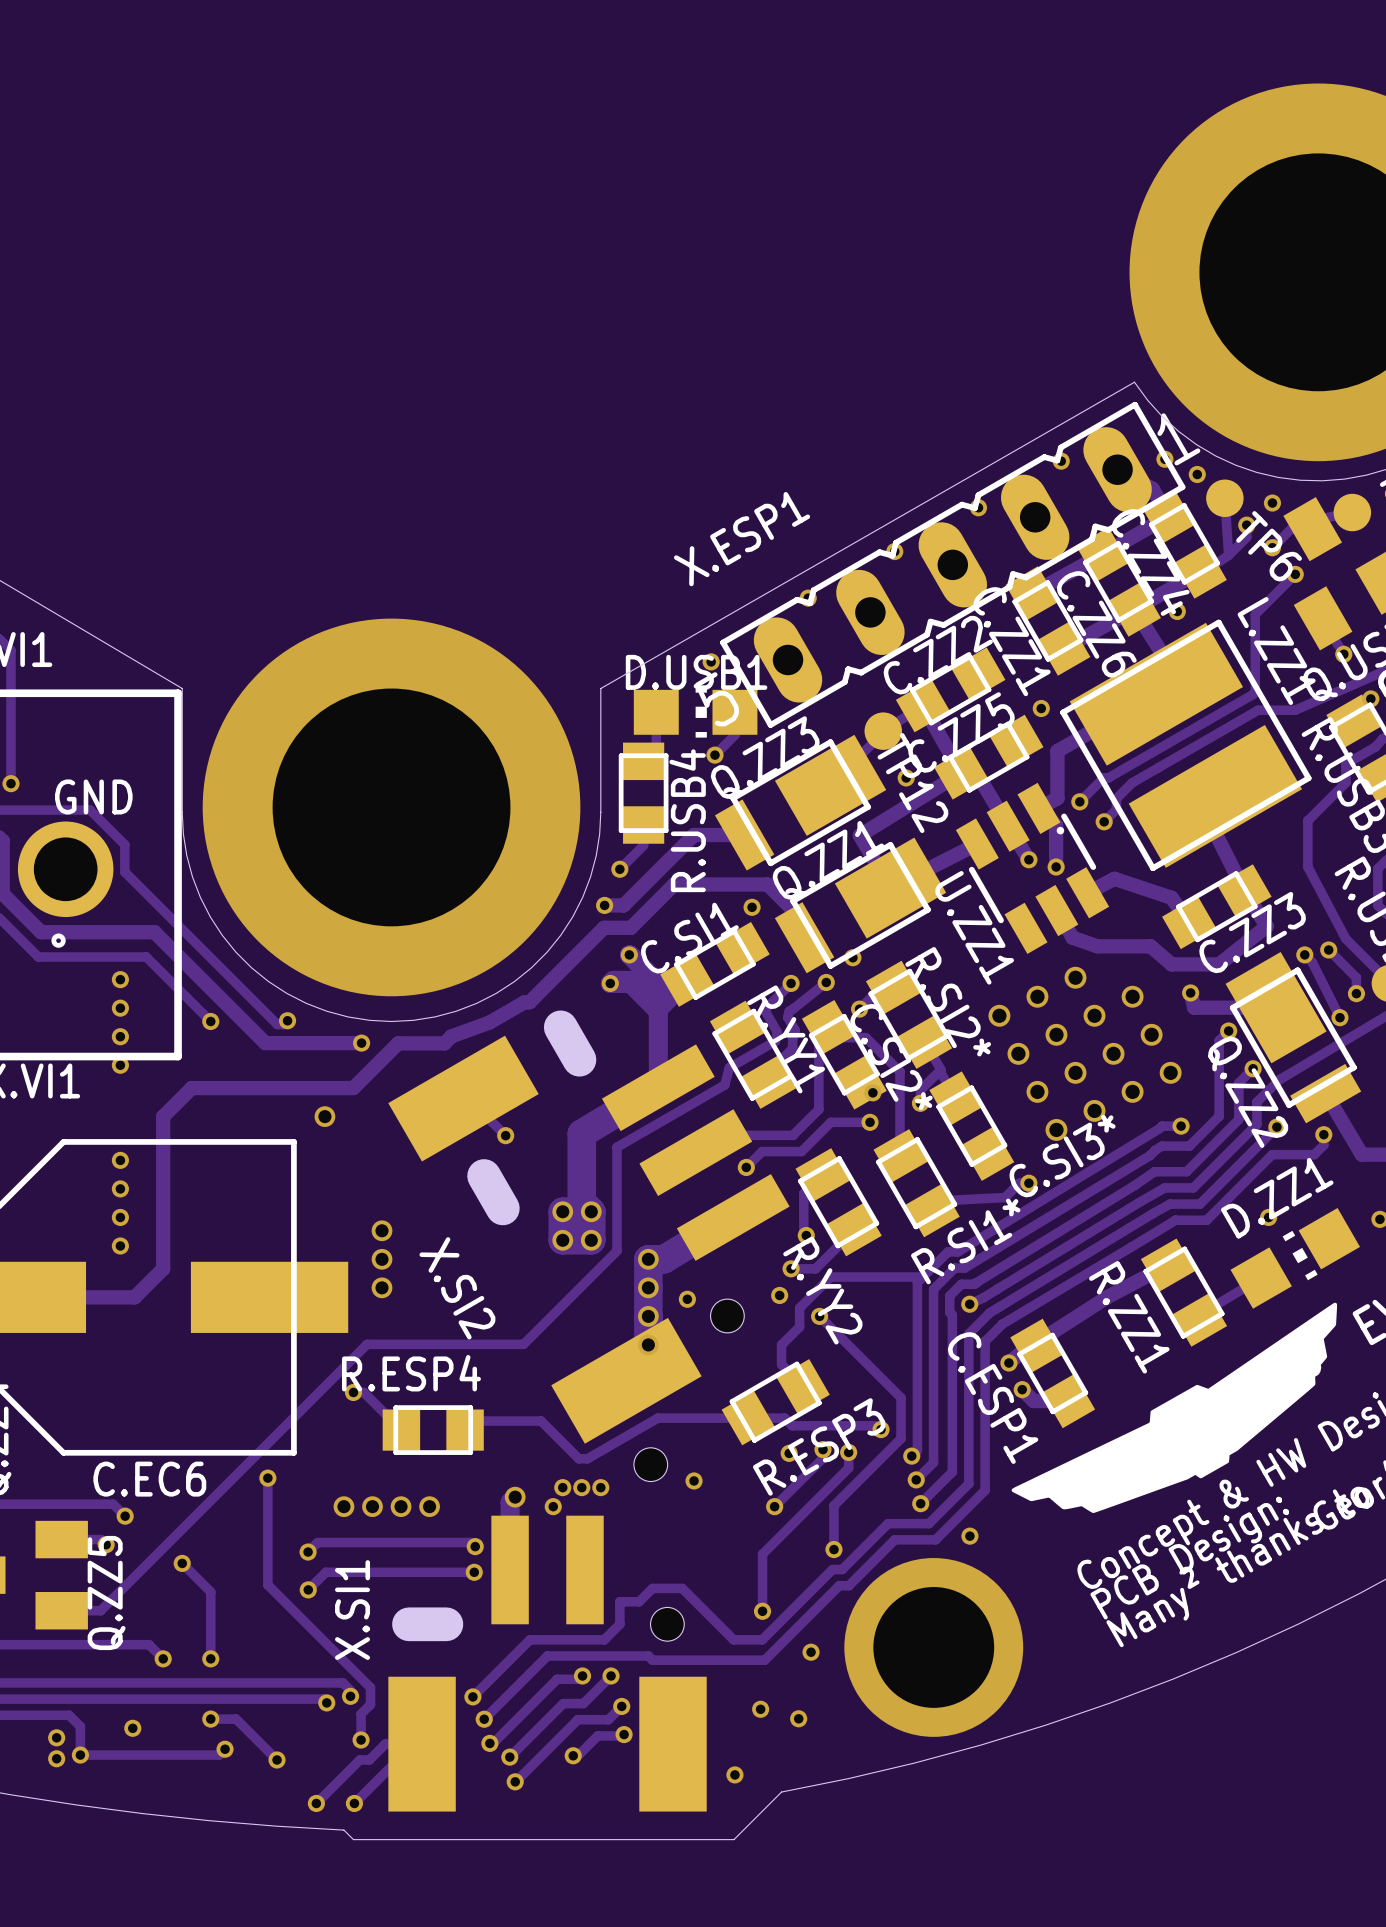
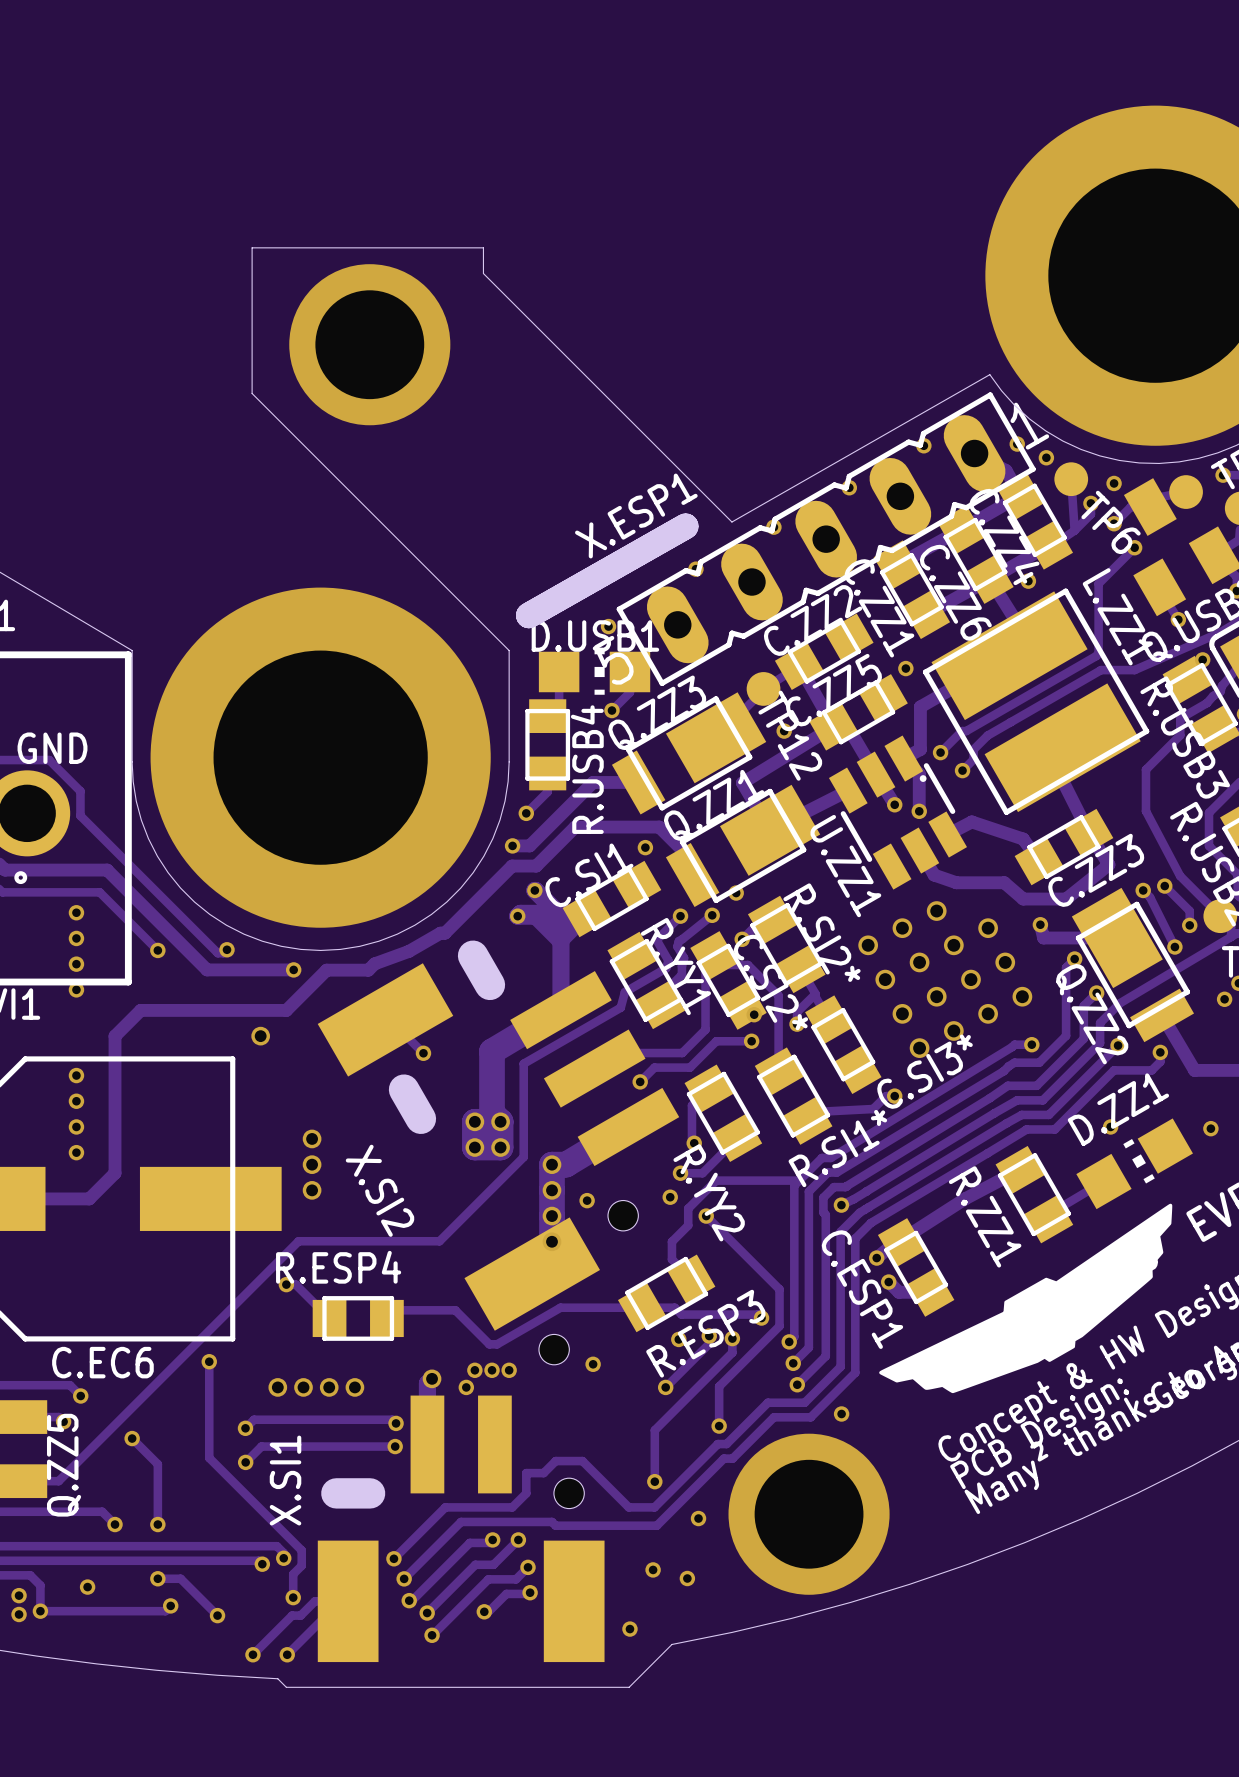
via: none -> (369, 344)
board edge: (1134, 382) (600, 688) -> (989, 374) (731, 522) (483, 273) (483, 247) (252, 247) (252, 393) (509, 650)
board edge: none -> (685, 526) (528, 615)

